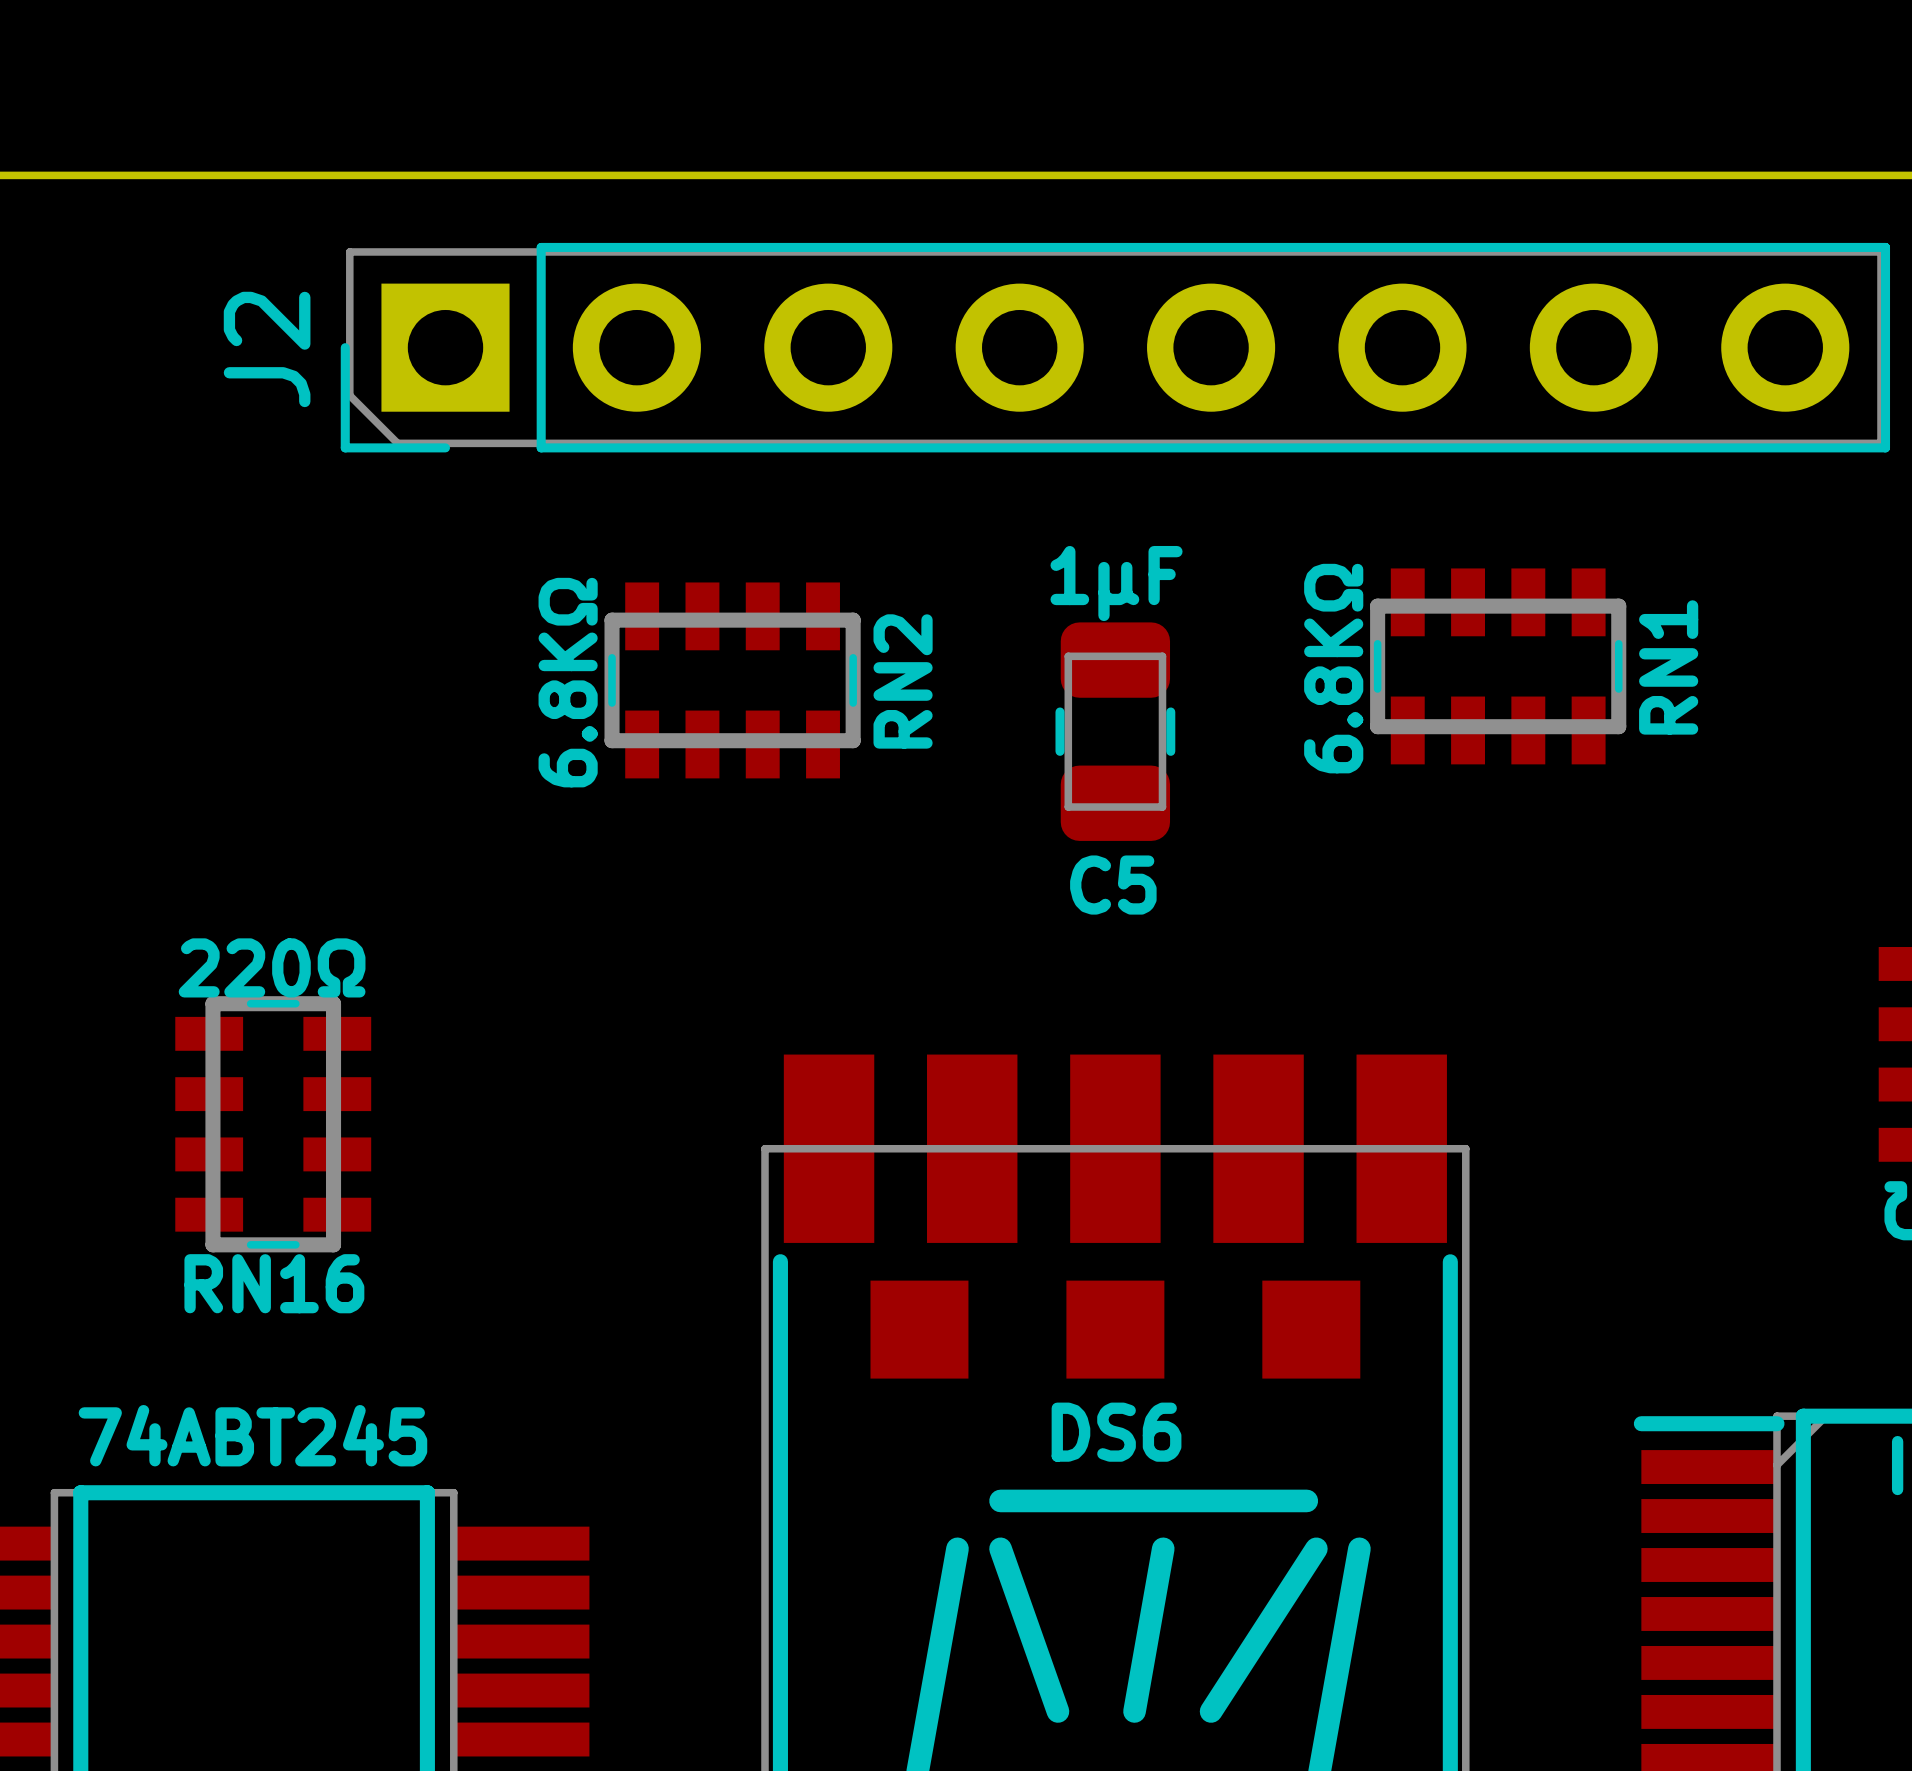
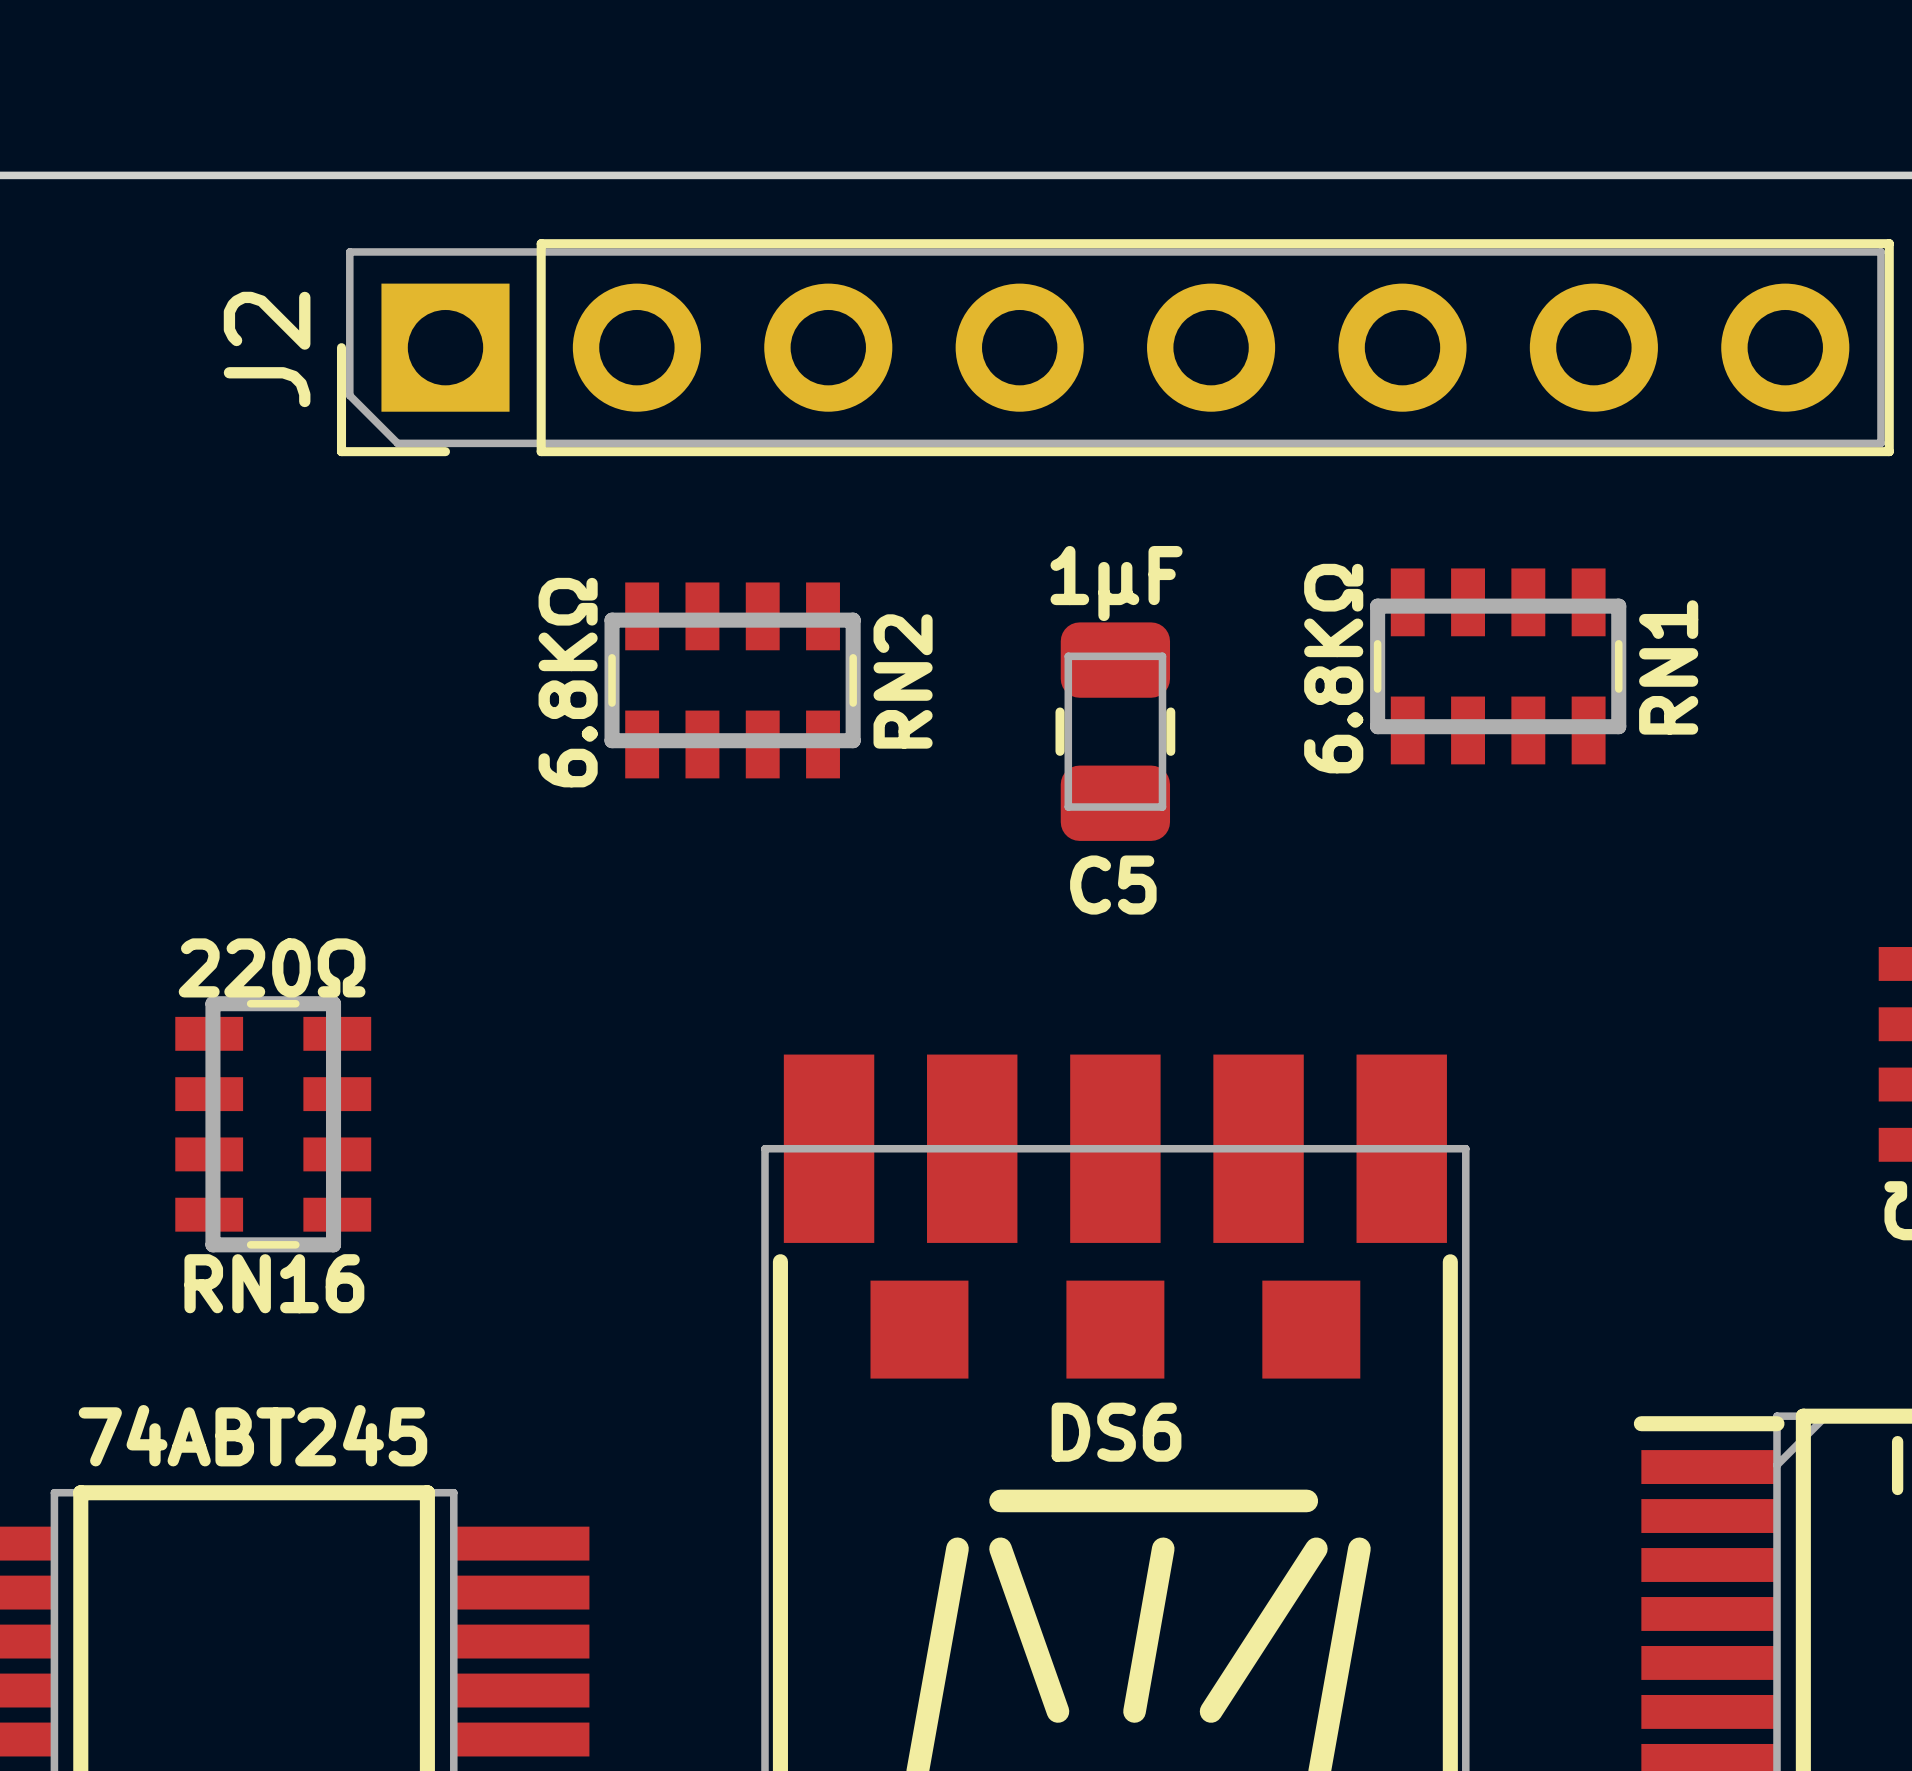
J2 footprint: [340, 242, 1891, 453] -> [336, 239, 1894, 457]

